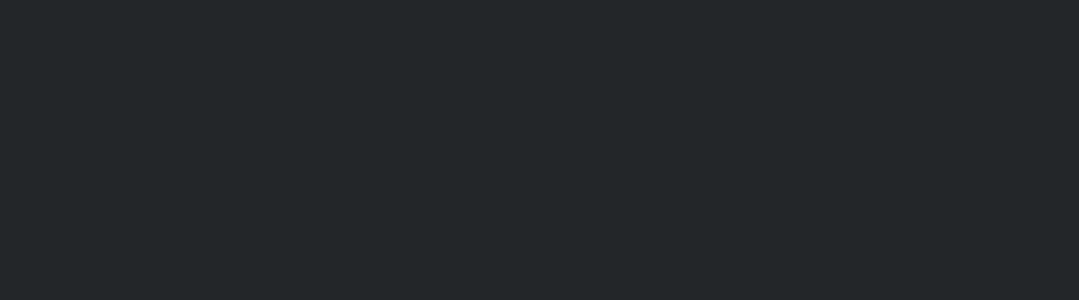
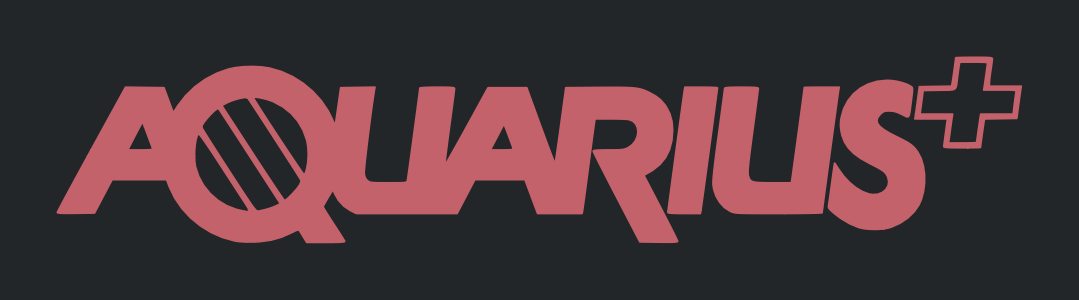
power symbol: none -> (539, 149)

